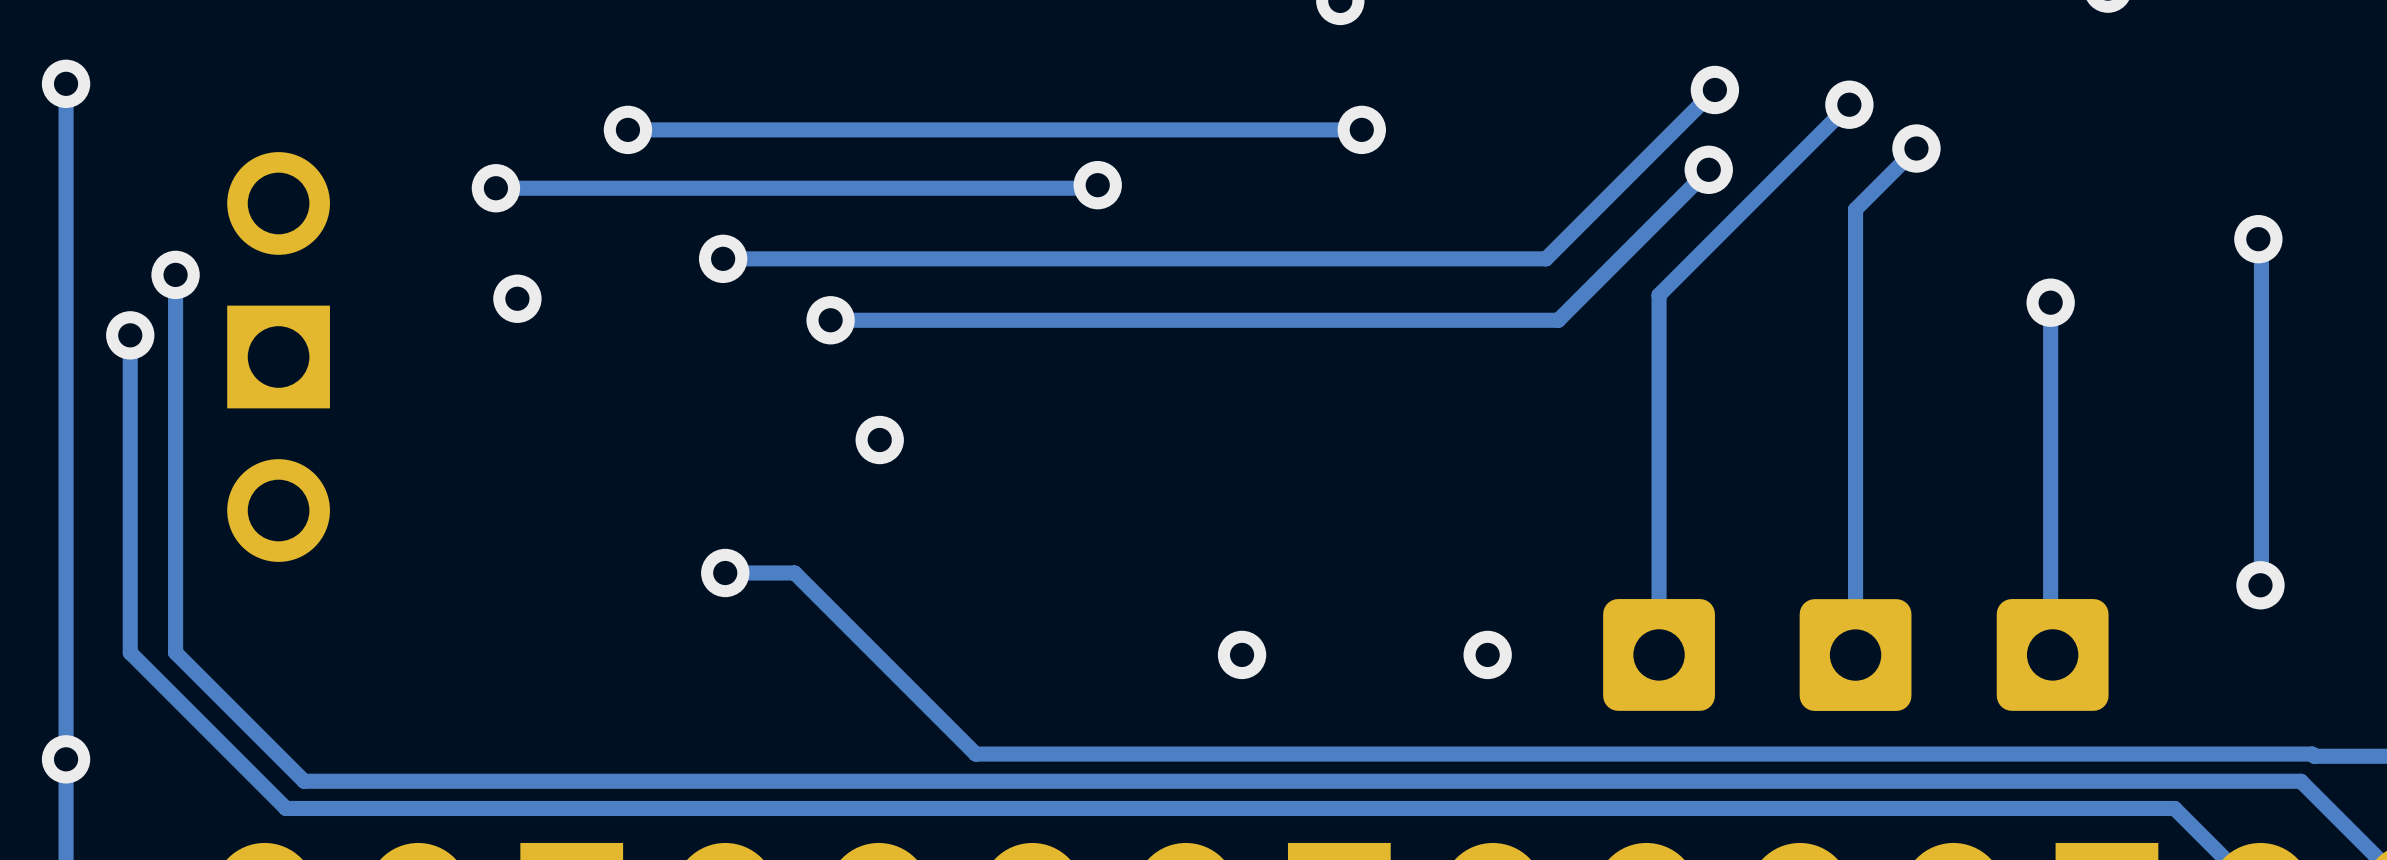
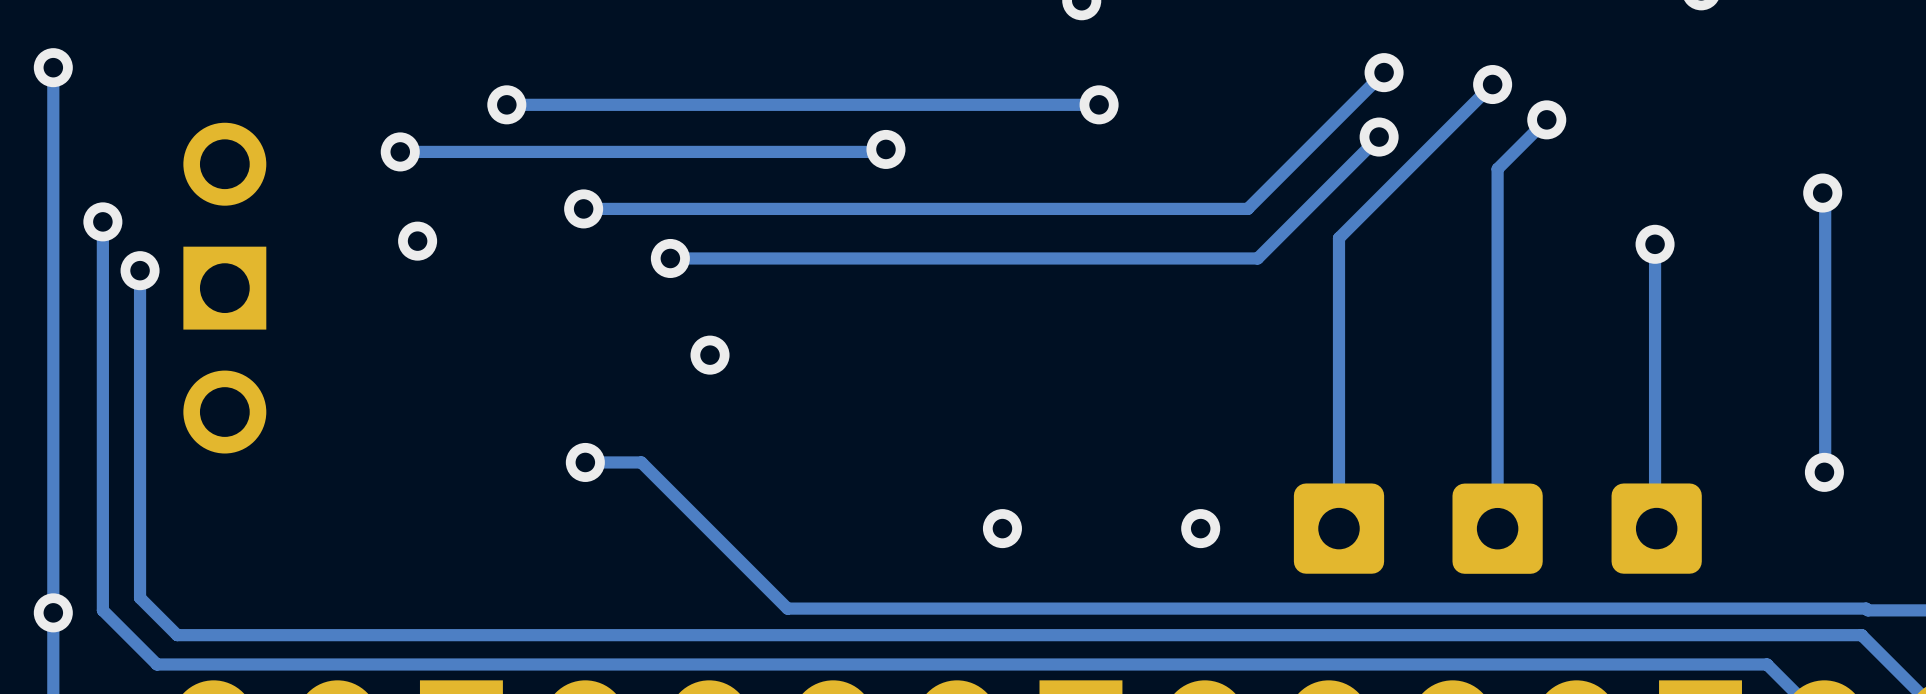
track: (175, 274) (175, 652) (304, 781) (2300, 781) (2306, 786) -> (140, 270) (140, 597) (177, 635) (1861, 635)
via position: (175, 274) -> (102, 221)
track: (130, 335) (130, 652) (286, 808) (2174, 808) (2189, 823) -> (102, 221) (102, 610) (156, 664) (1767, 664)
via position: (130, 335) -> (140, 270)

